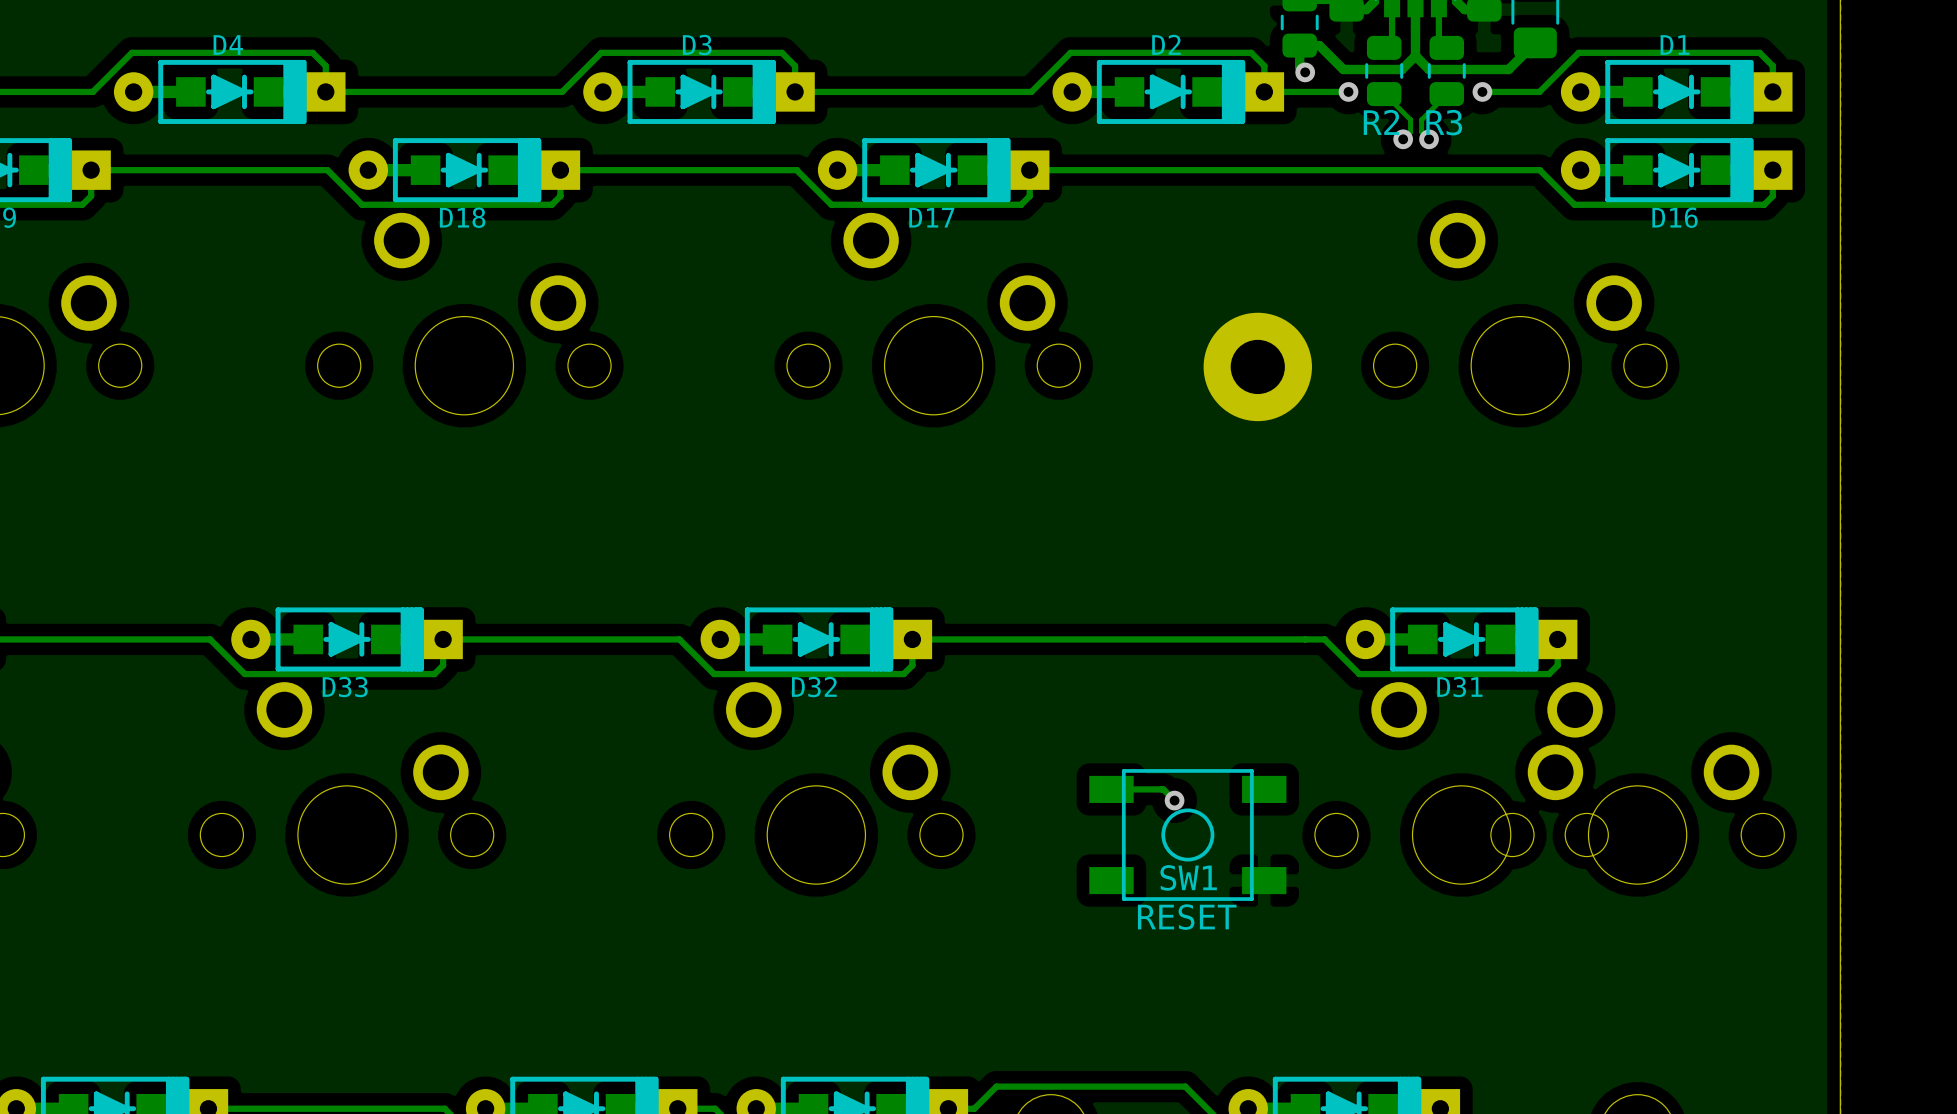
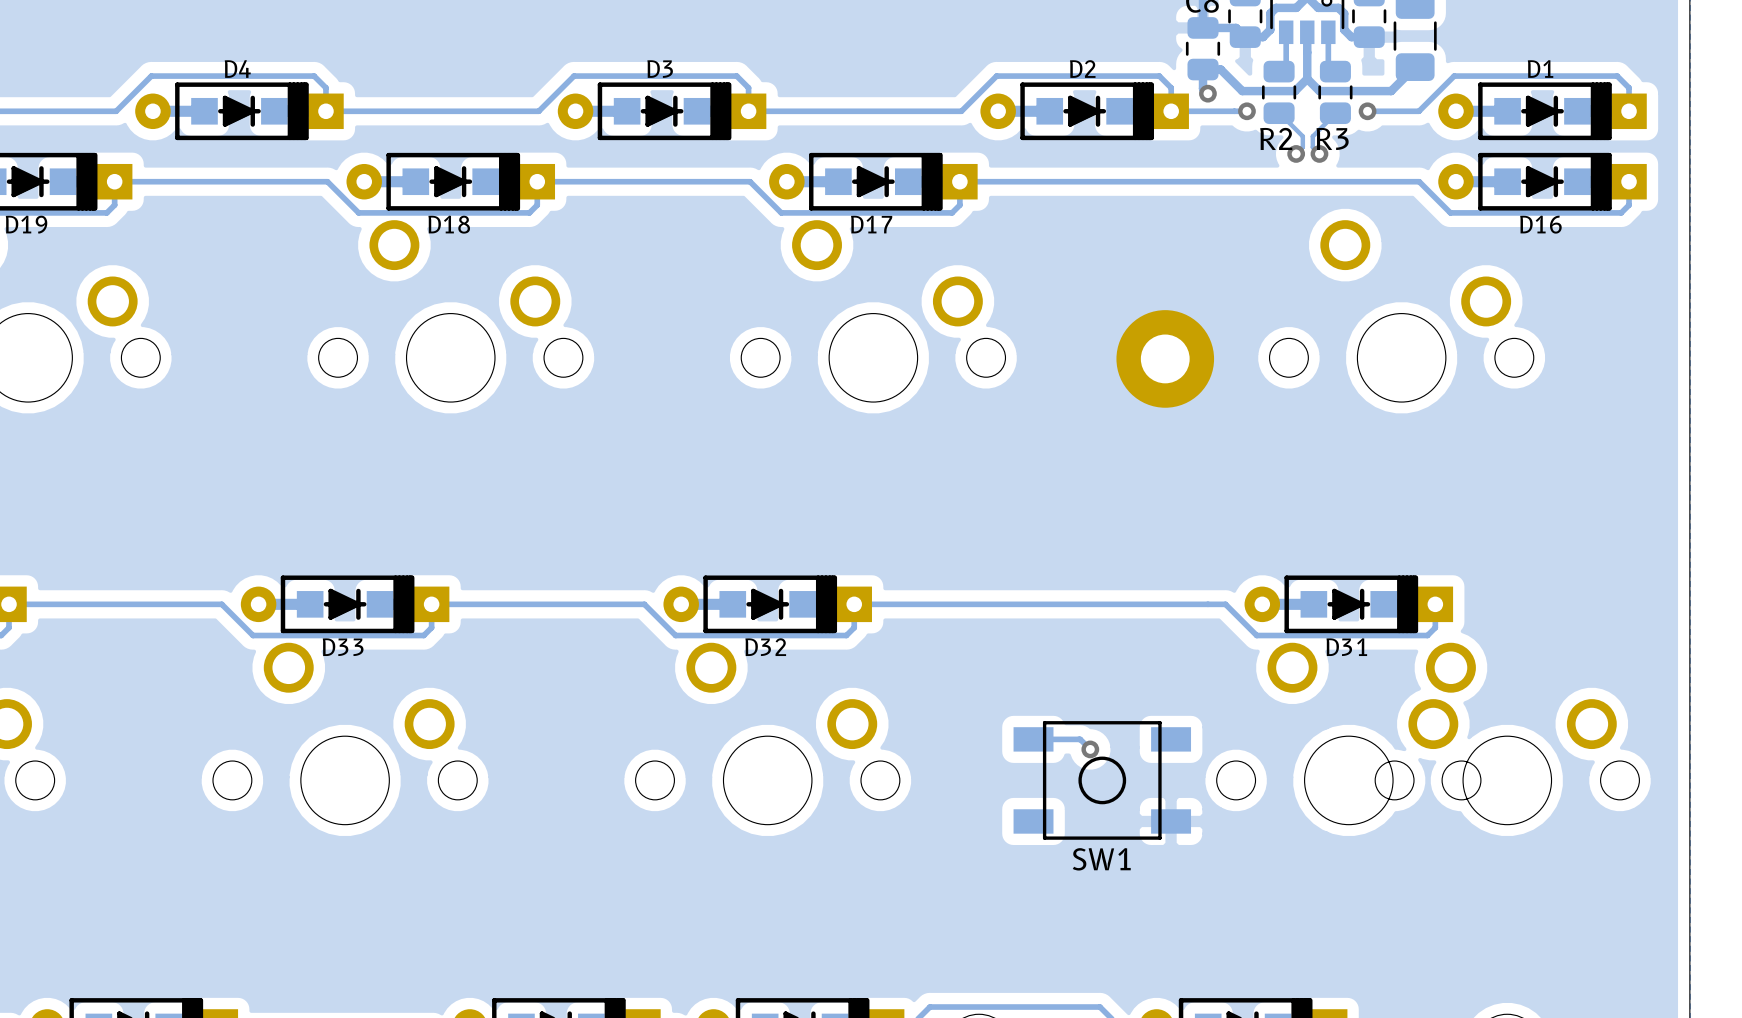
SW1 name position: SW1 (1188, 877) -> SW1 (1101, 859)
text: RESET (1187, 917) -> none

